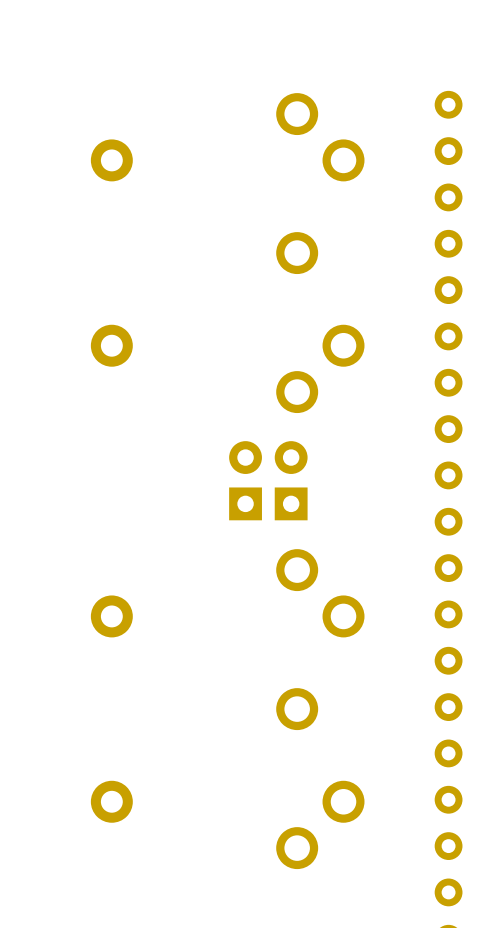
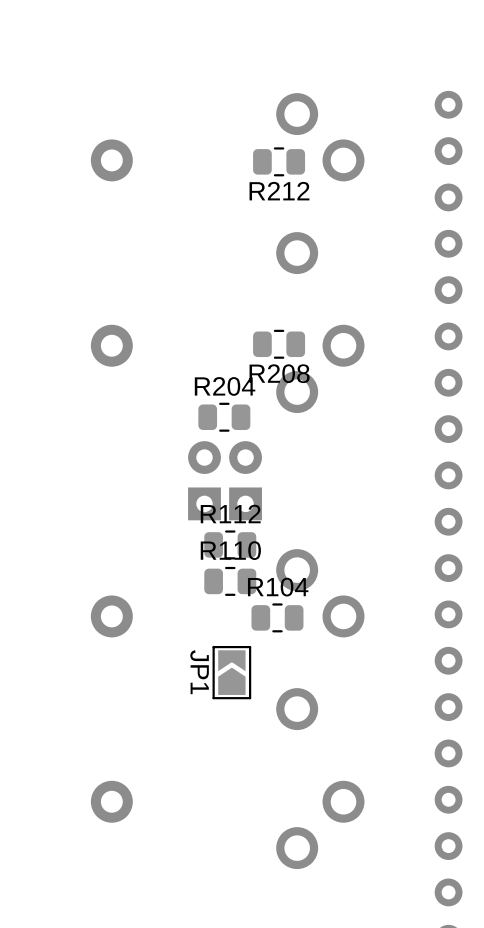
R212: none -> (279, 161)
R208: none -> (279, 344)
R204: none -> (224, 417)
part position: (291, 480) -> (204, 480)
R112: none -> (230, 544)
R110: none -> (230, 581)
R104: none -> (277, 617)
JP1: none -> (231, 672)

